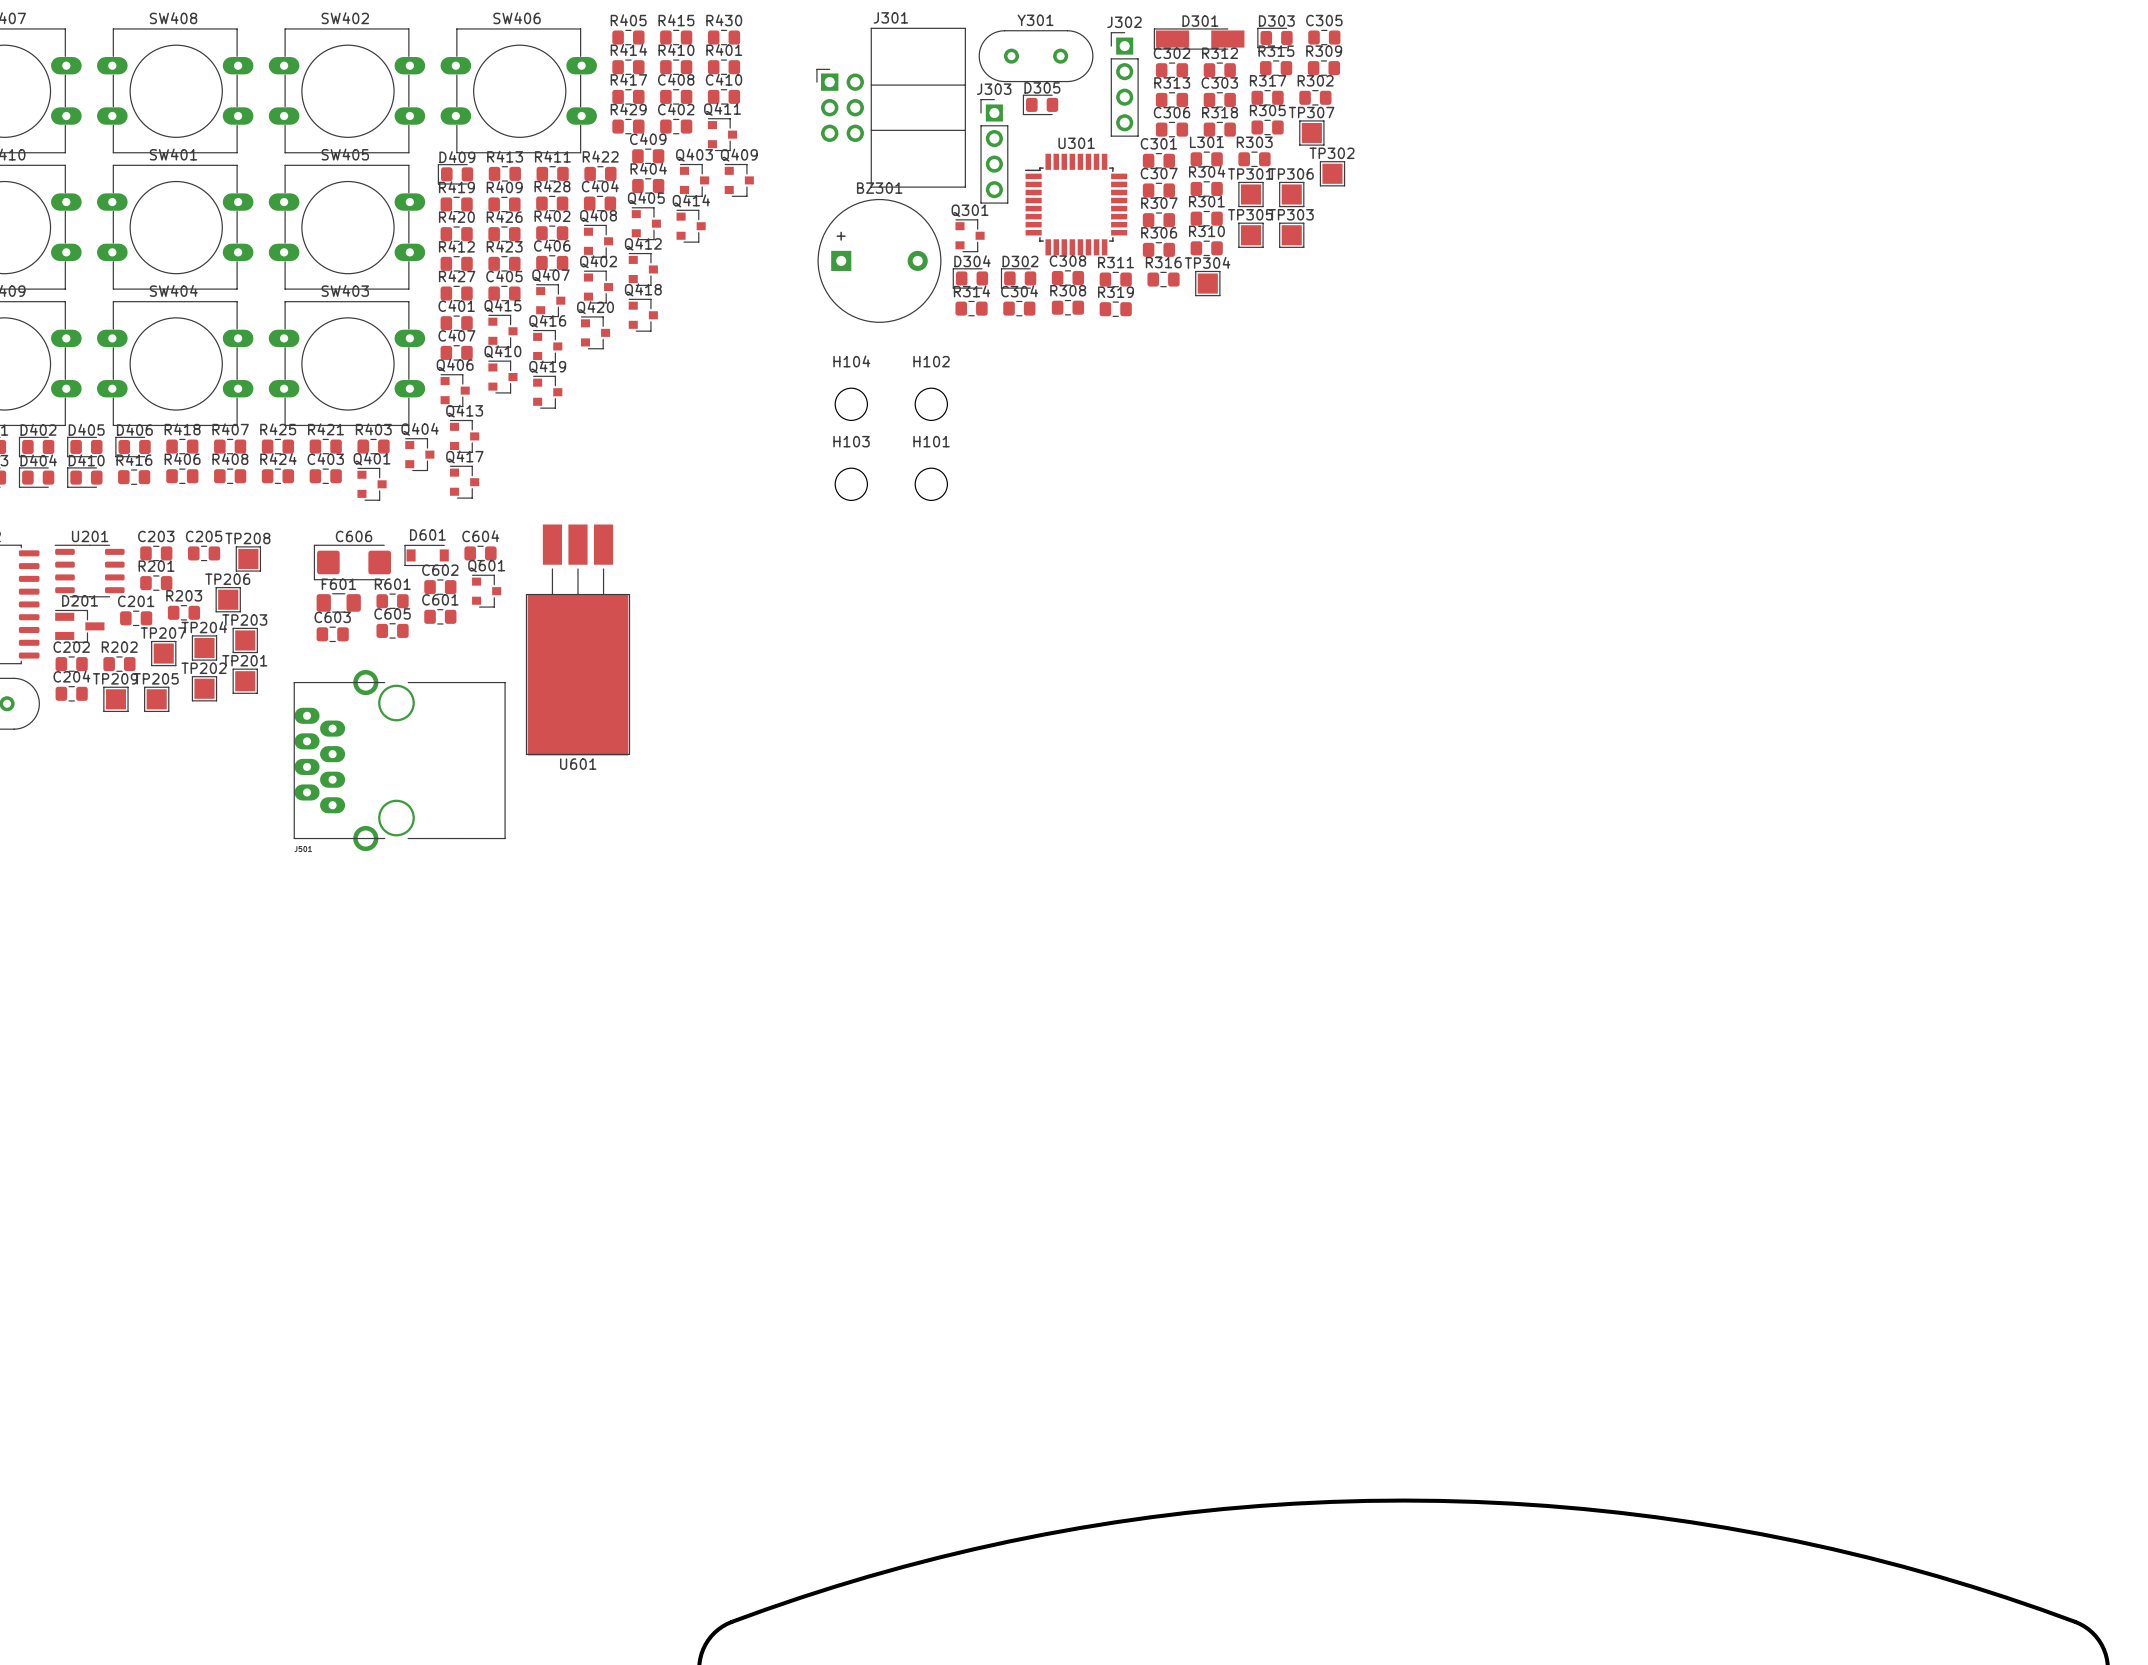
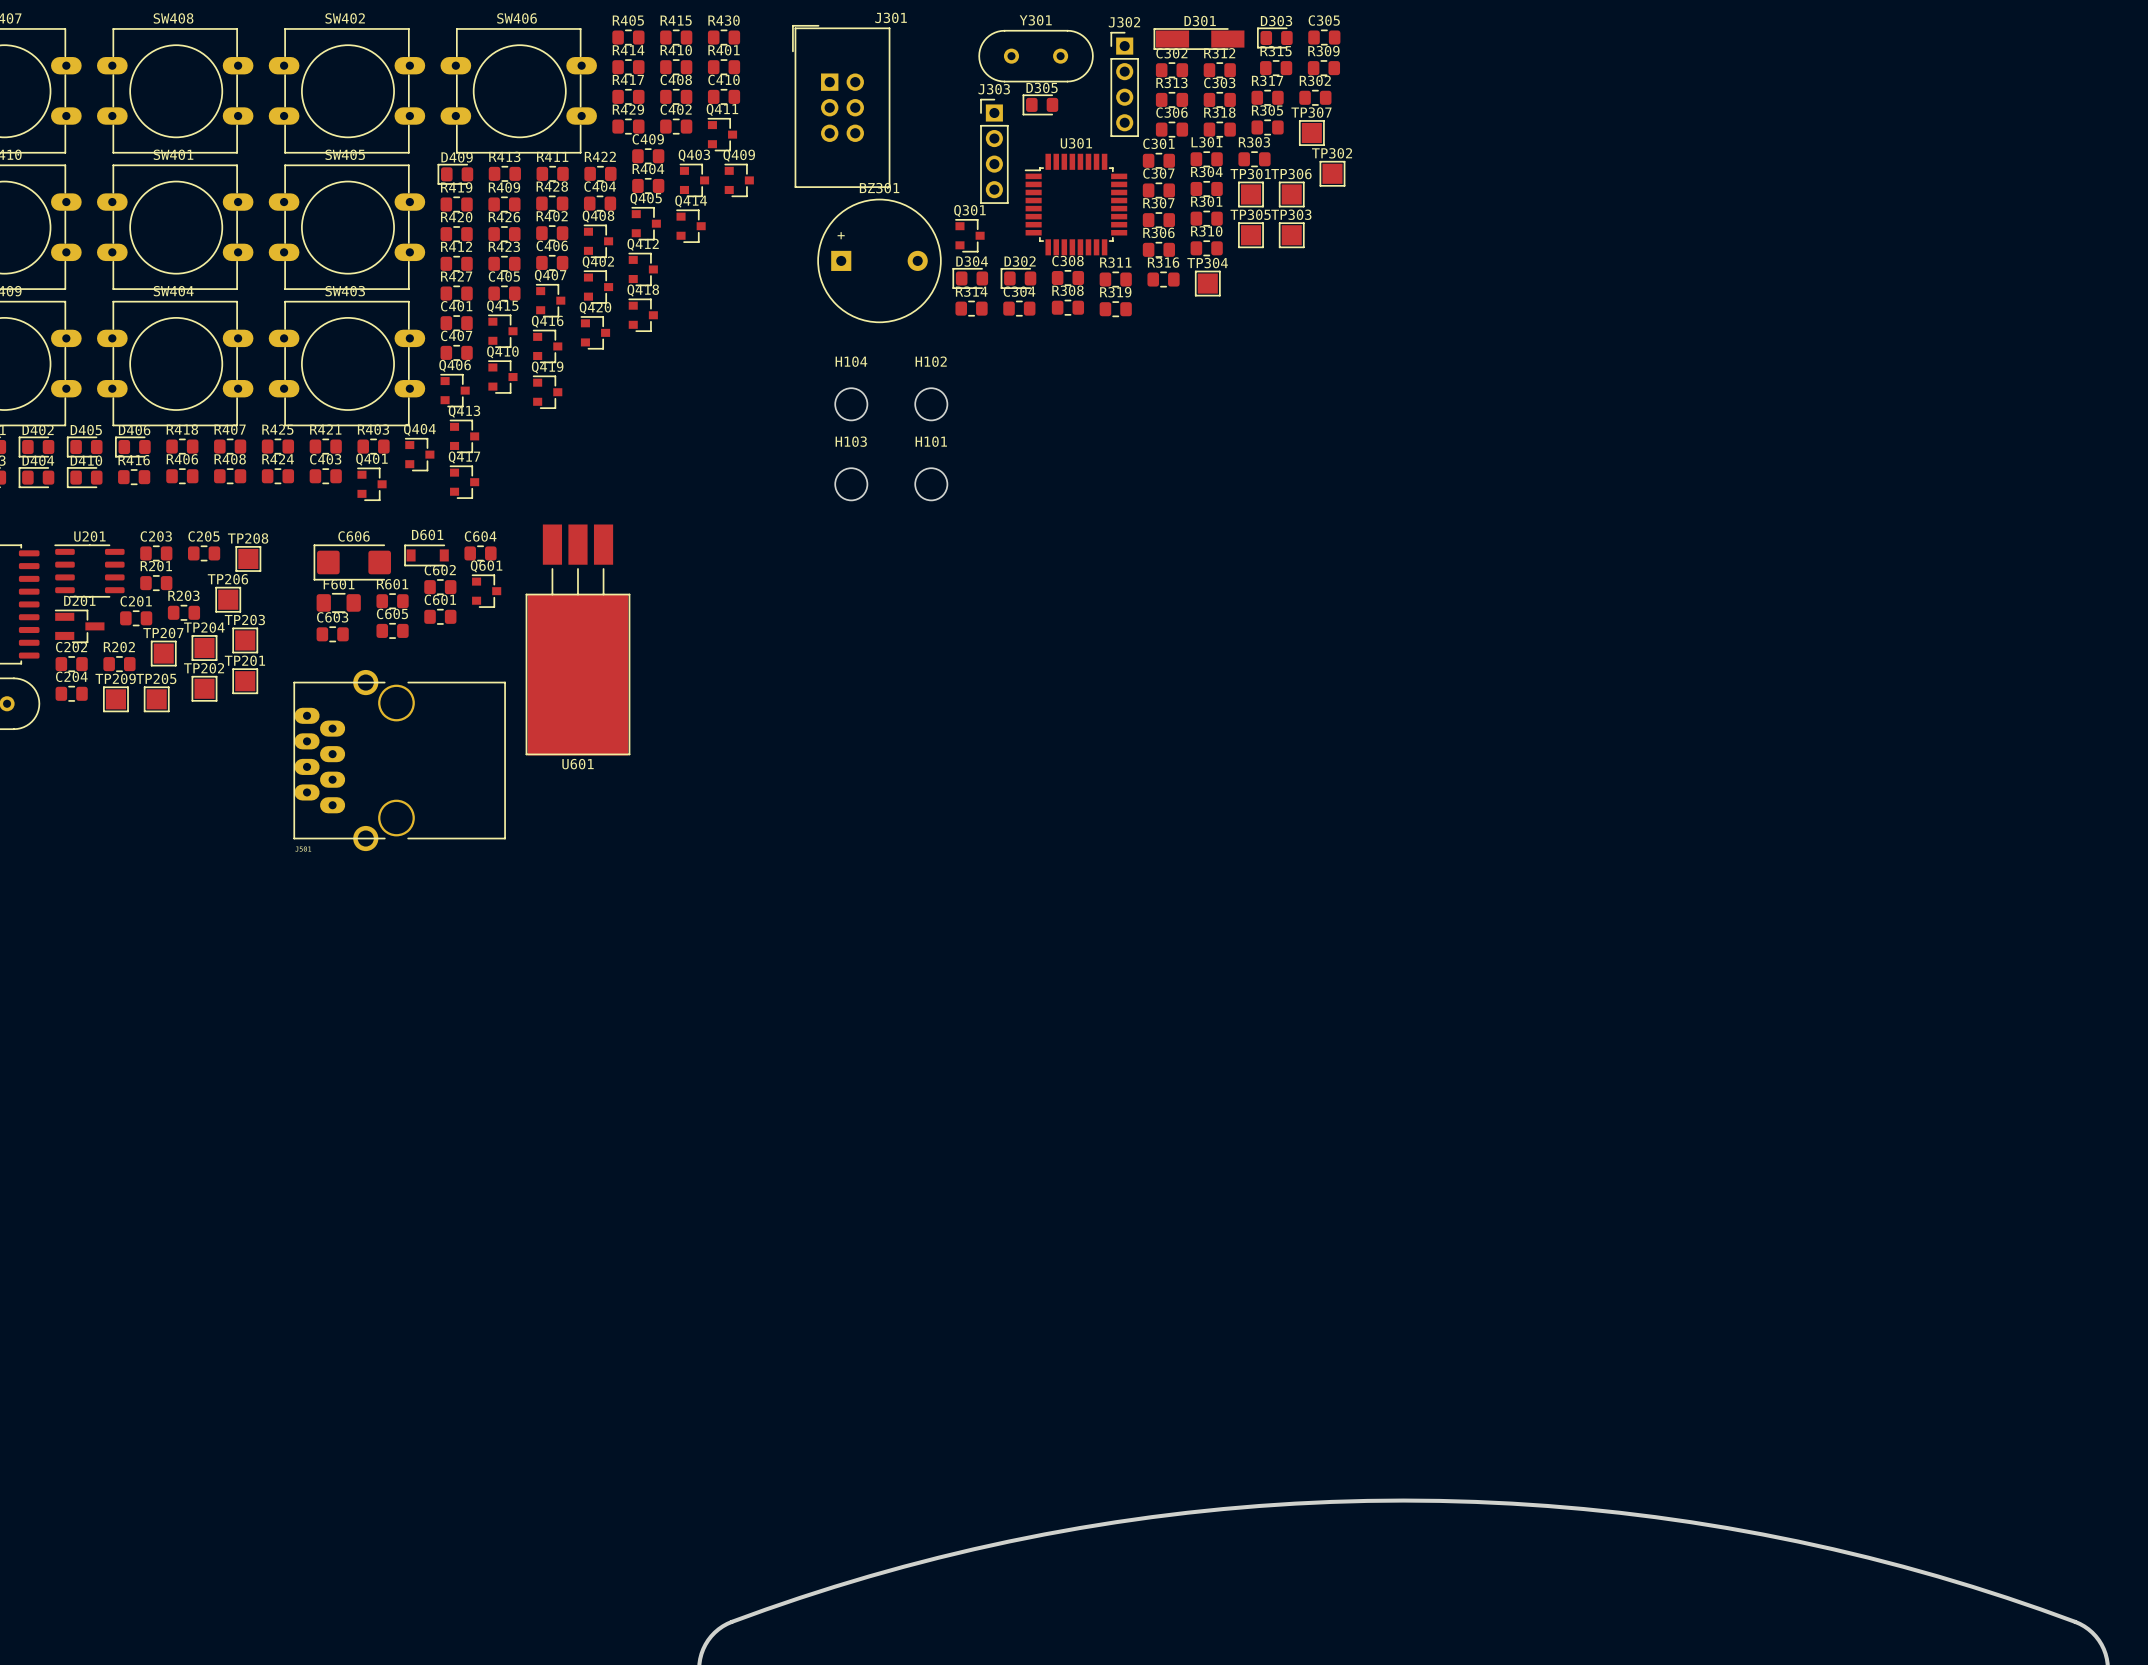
J301 footprint: [816, 27, 966, 188] -> [792, 25, 891, 188]

